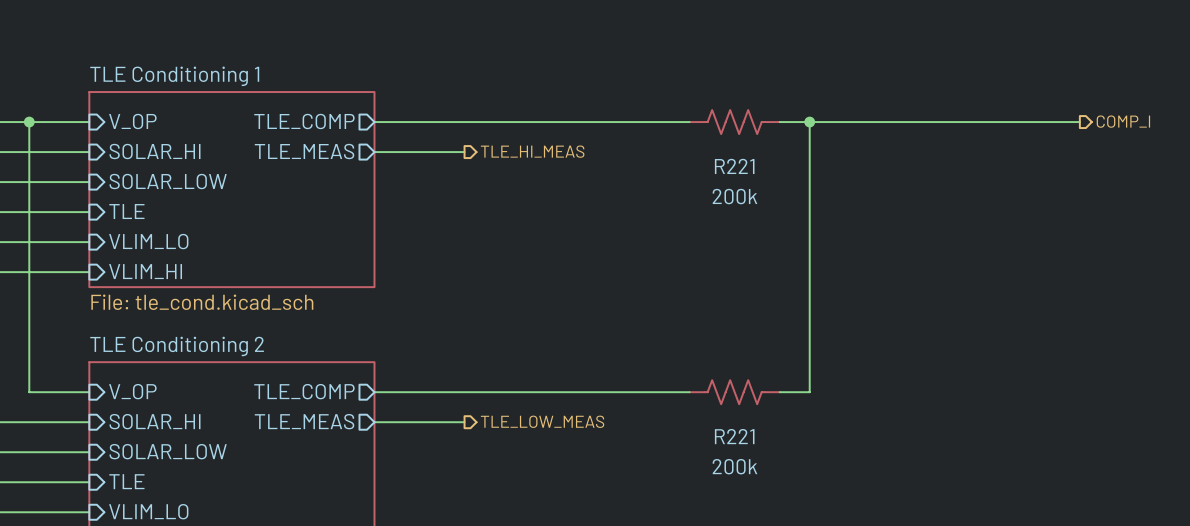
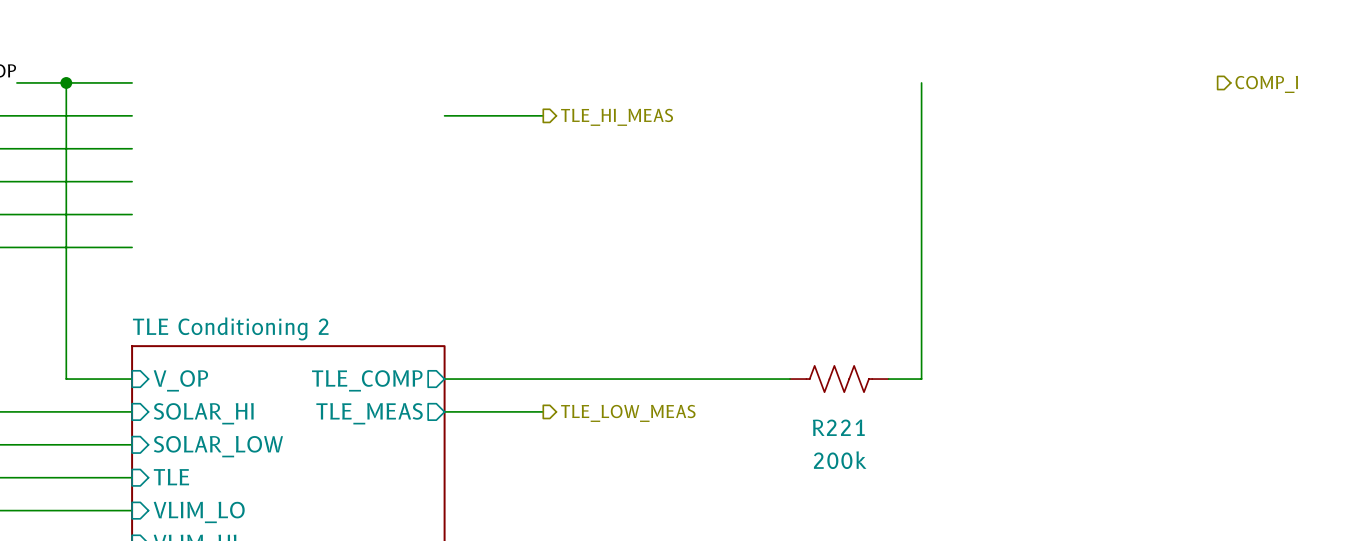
sheet pin: V_OP (132, 121) -> none
sheet pin: TLE_COMP (304, 121) -> none
wire: (374, 122) (689, 122) -> none
R221: 200k (734, 122) -> none
wire: (779, 122) (1079, 122) -> none
junction: (809, 122) -> none
sheet pin: SOLAR_HI (155, 151) -> none
sheet pin: TLE_MEAS (304, 151) -> none
sheet pin: SOLAR_LOW (168, 181) -> none
sheet TLE Conditioning 1: File: tle_cond.kicad_sch (231, 189) -> none
sheet pin: TLE (126, 211) -> none
sheet pin: VLIM_LO (148, 241) -> none
sheet pin: VLIM_HI (145, 271) -> none

